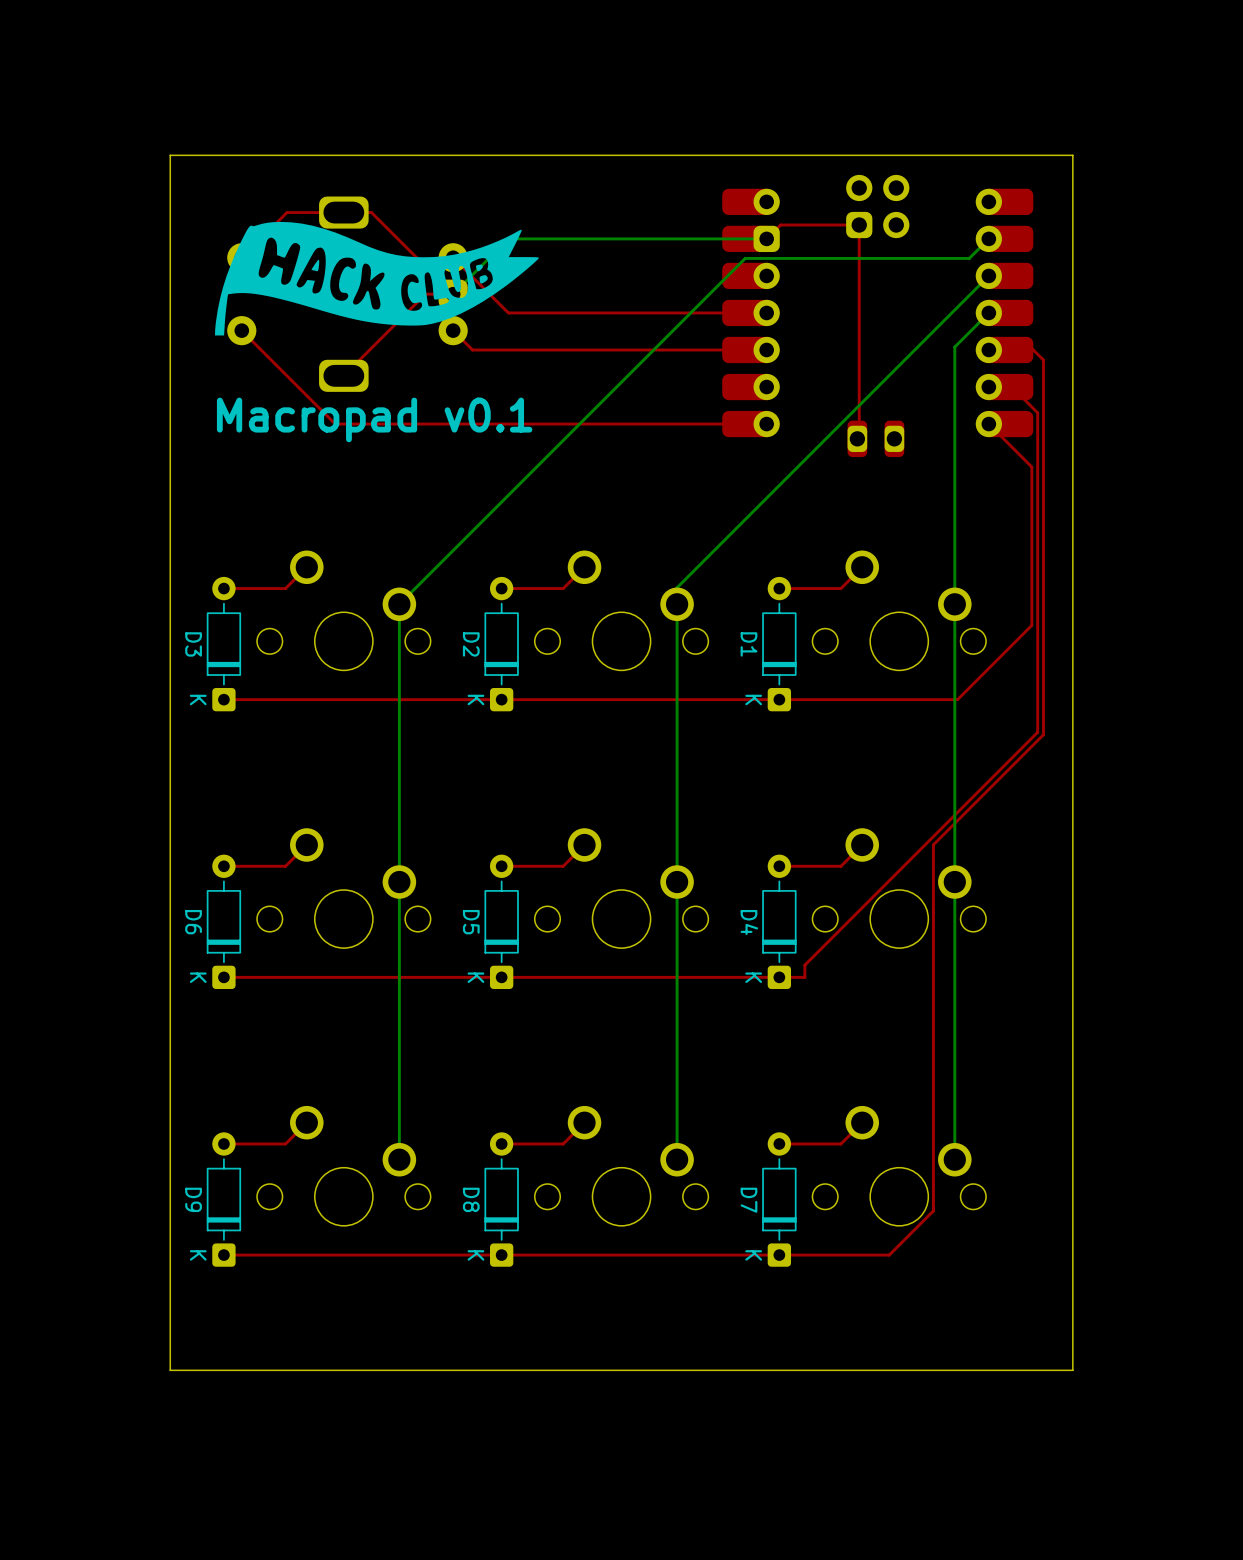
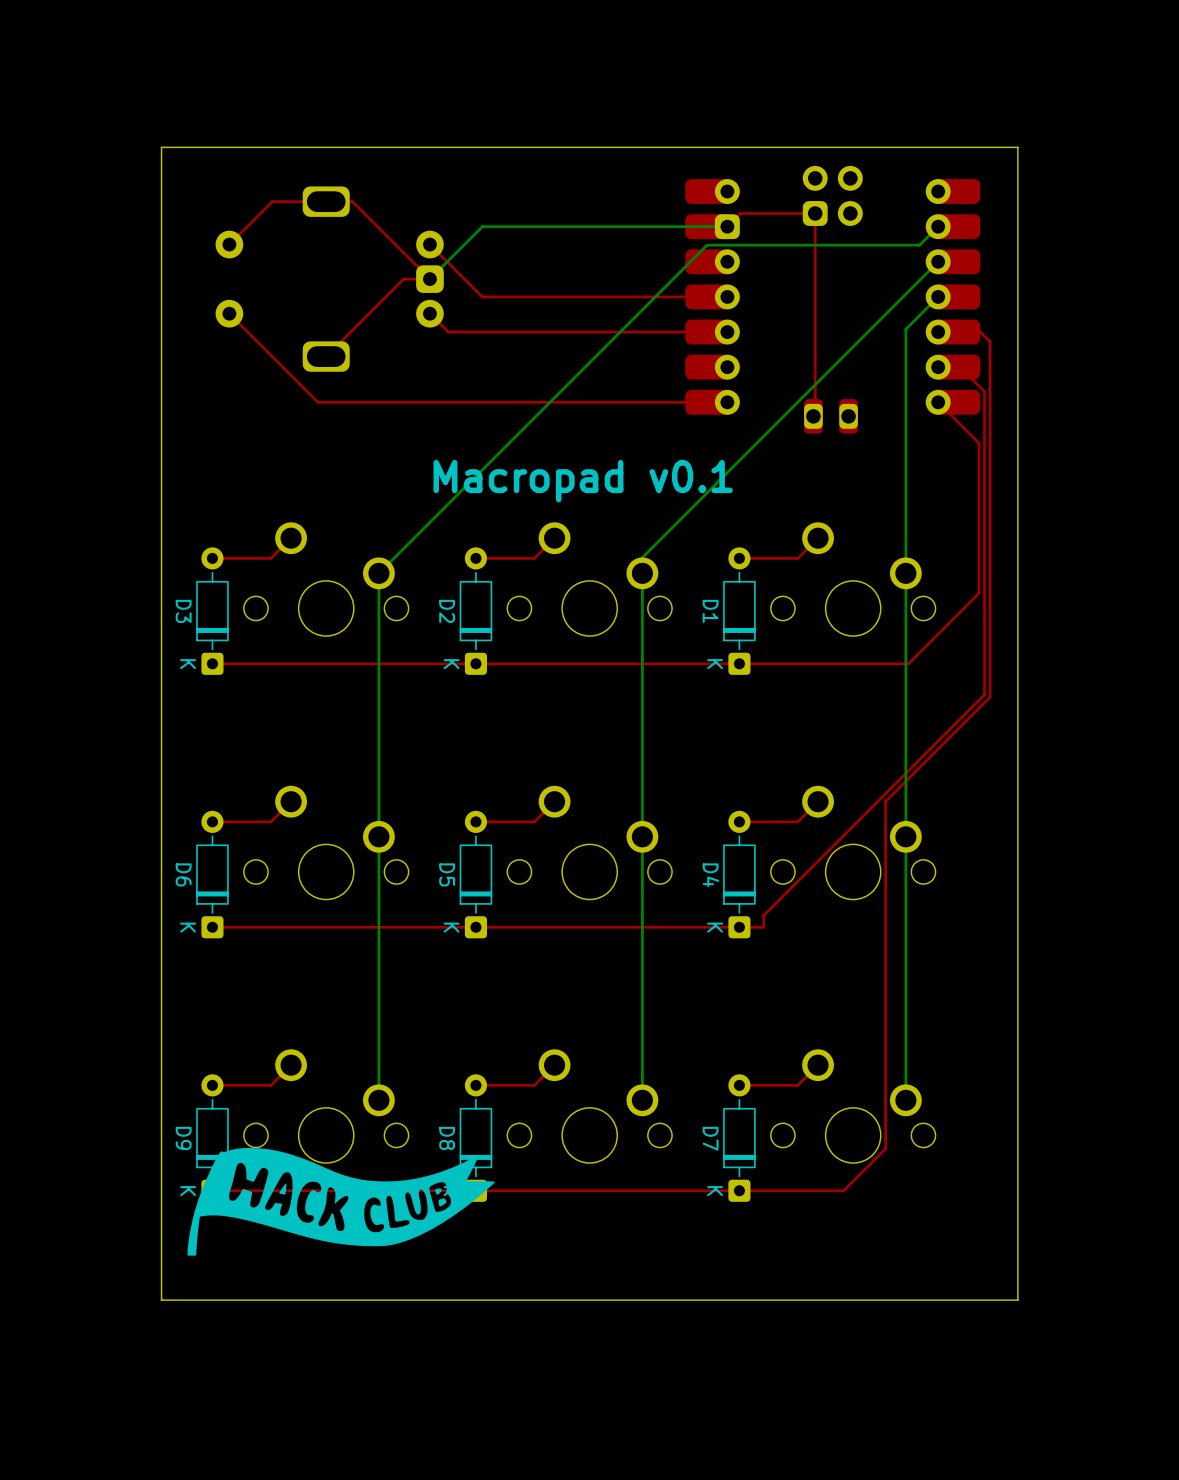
drawing: [215, 221, 539, 336] -> none
text position: Macropad v0.1 (374, 419) -> Macropad v0.1 (583, 481)
drawing: none -> [187, 1147, 495, 1256]

